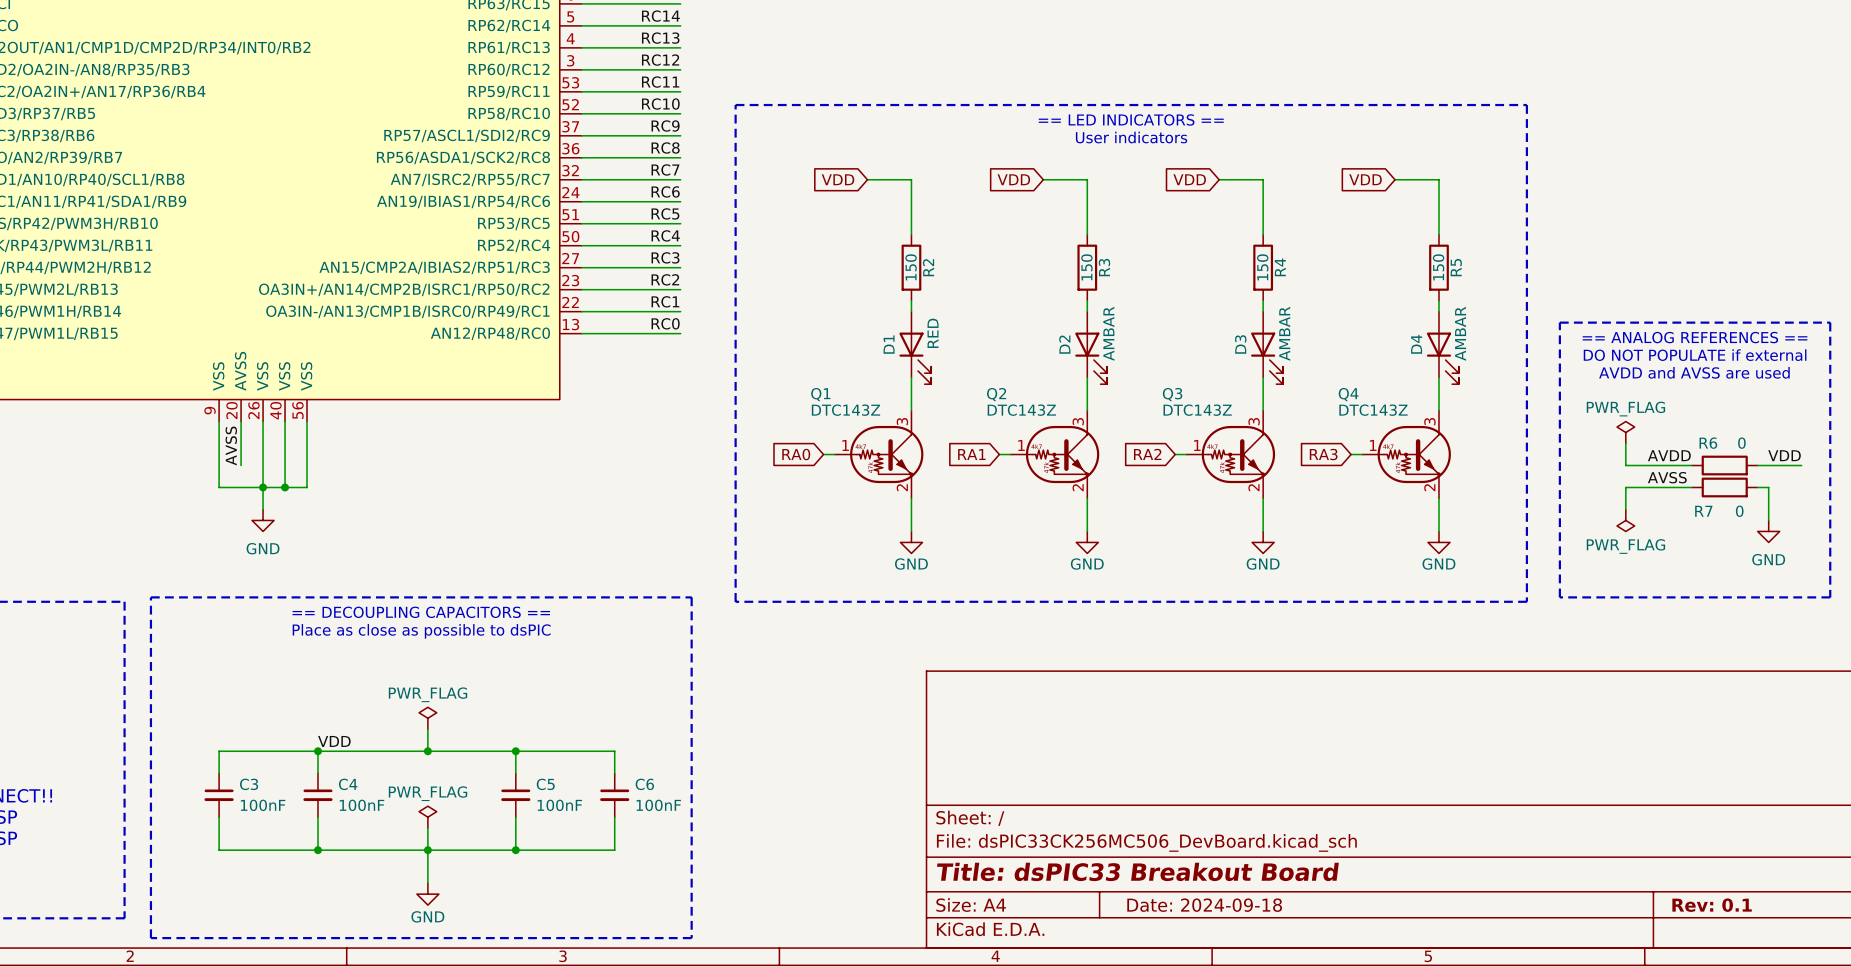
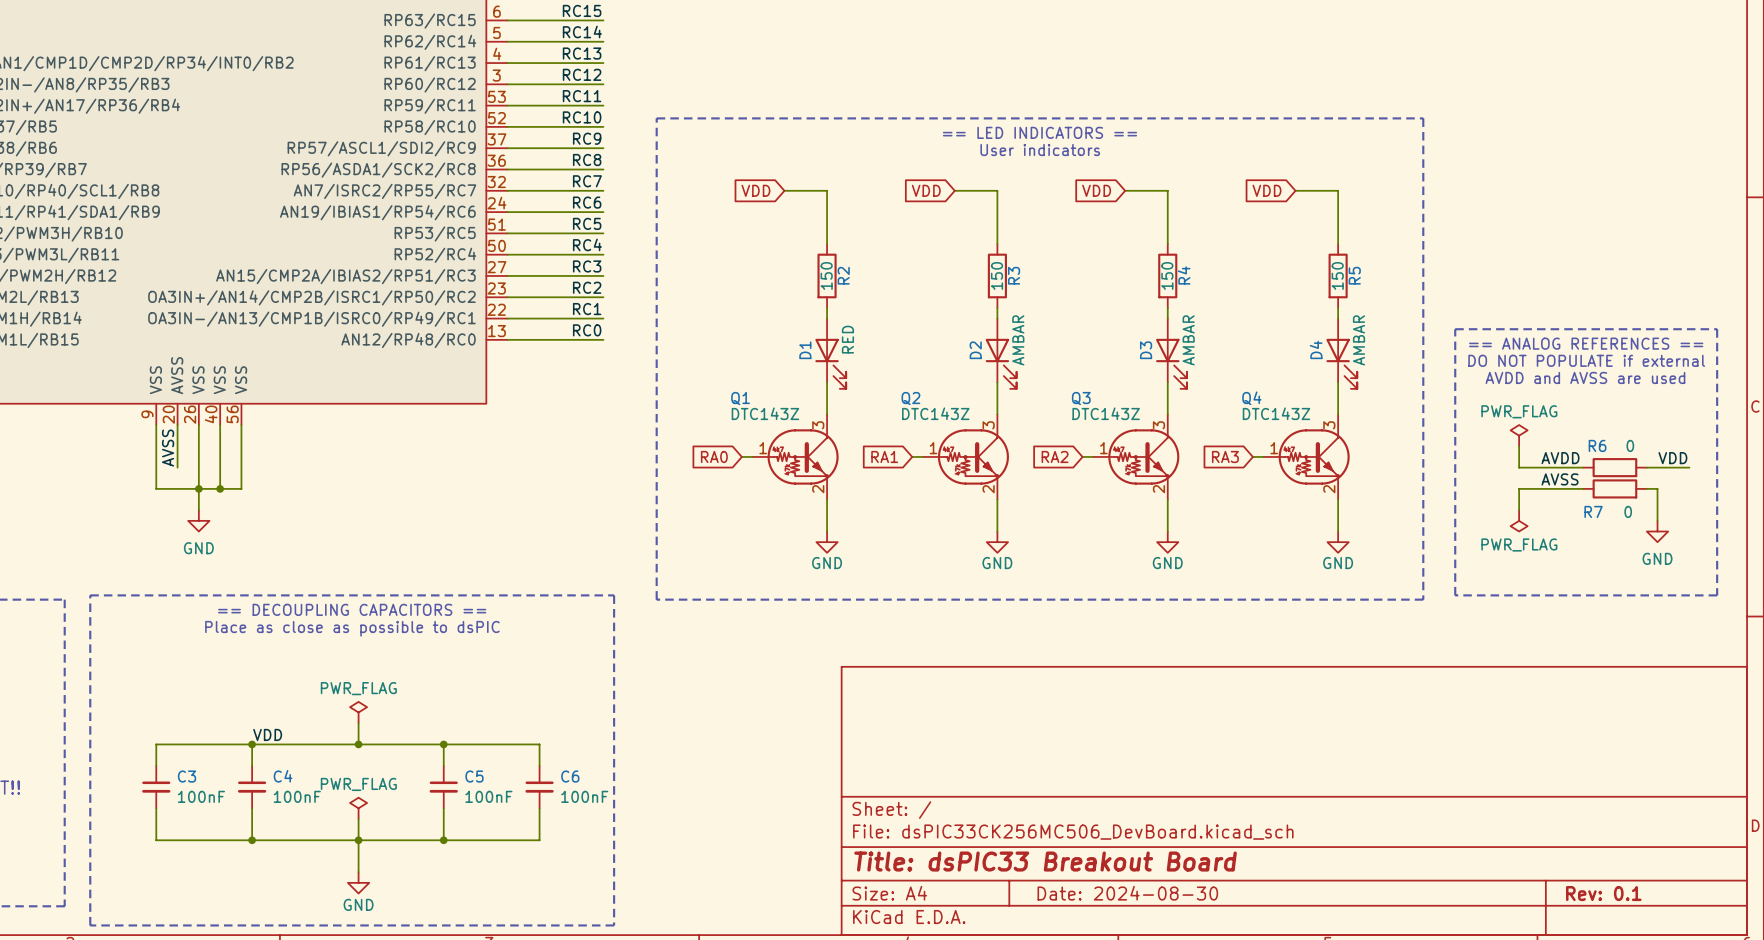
title block: Date: 2024-09-18 (1204, 905) -> Date: 2024-08-30 (1127, 893)

